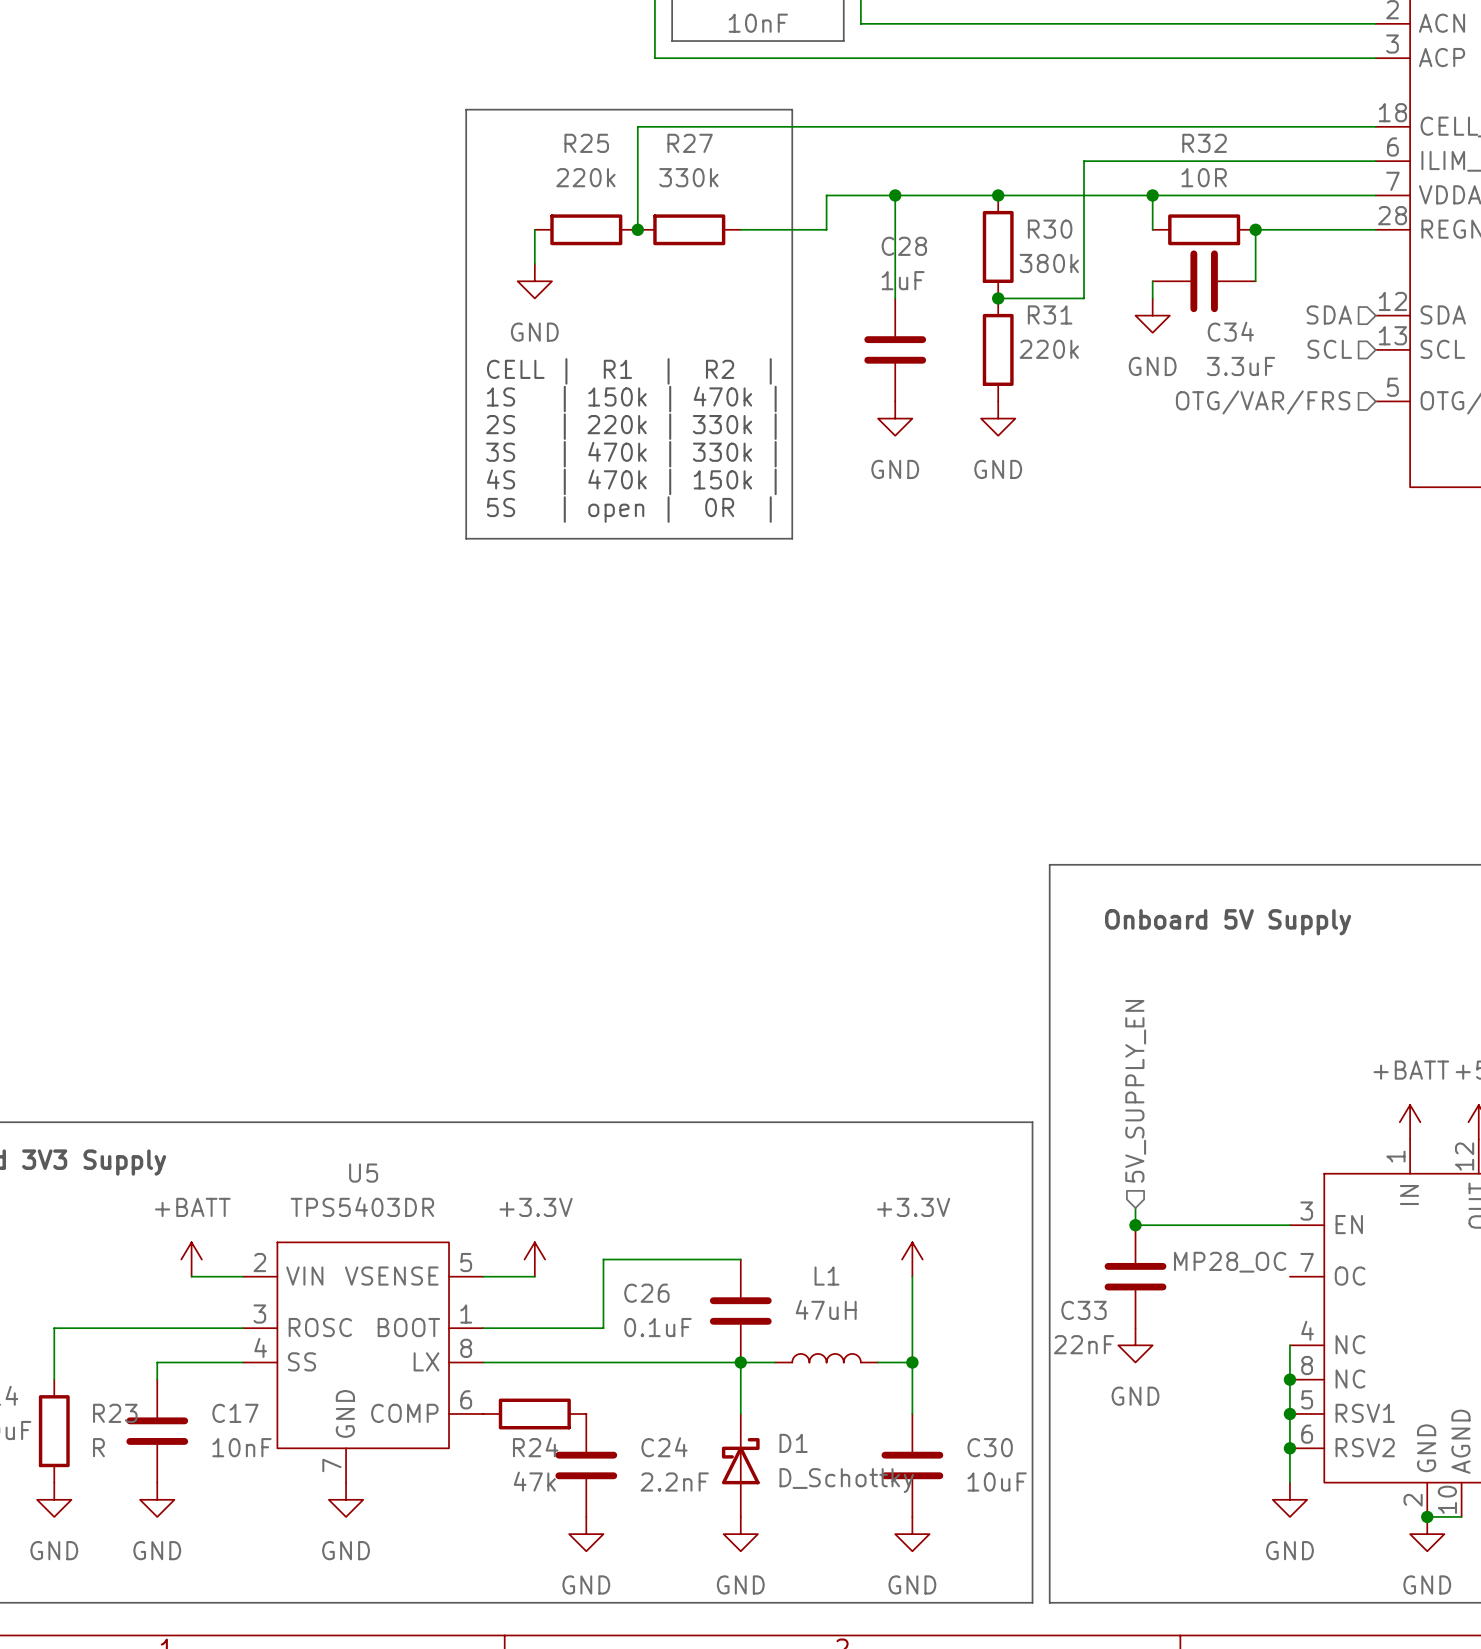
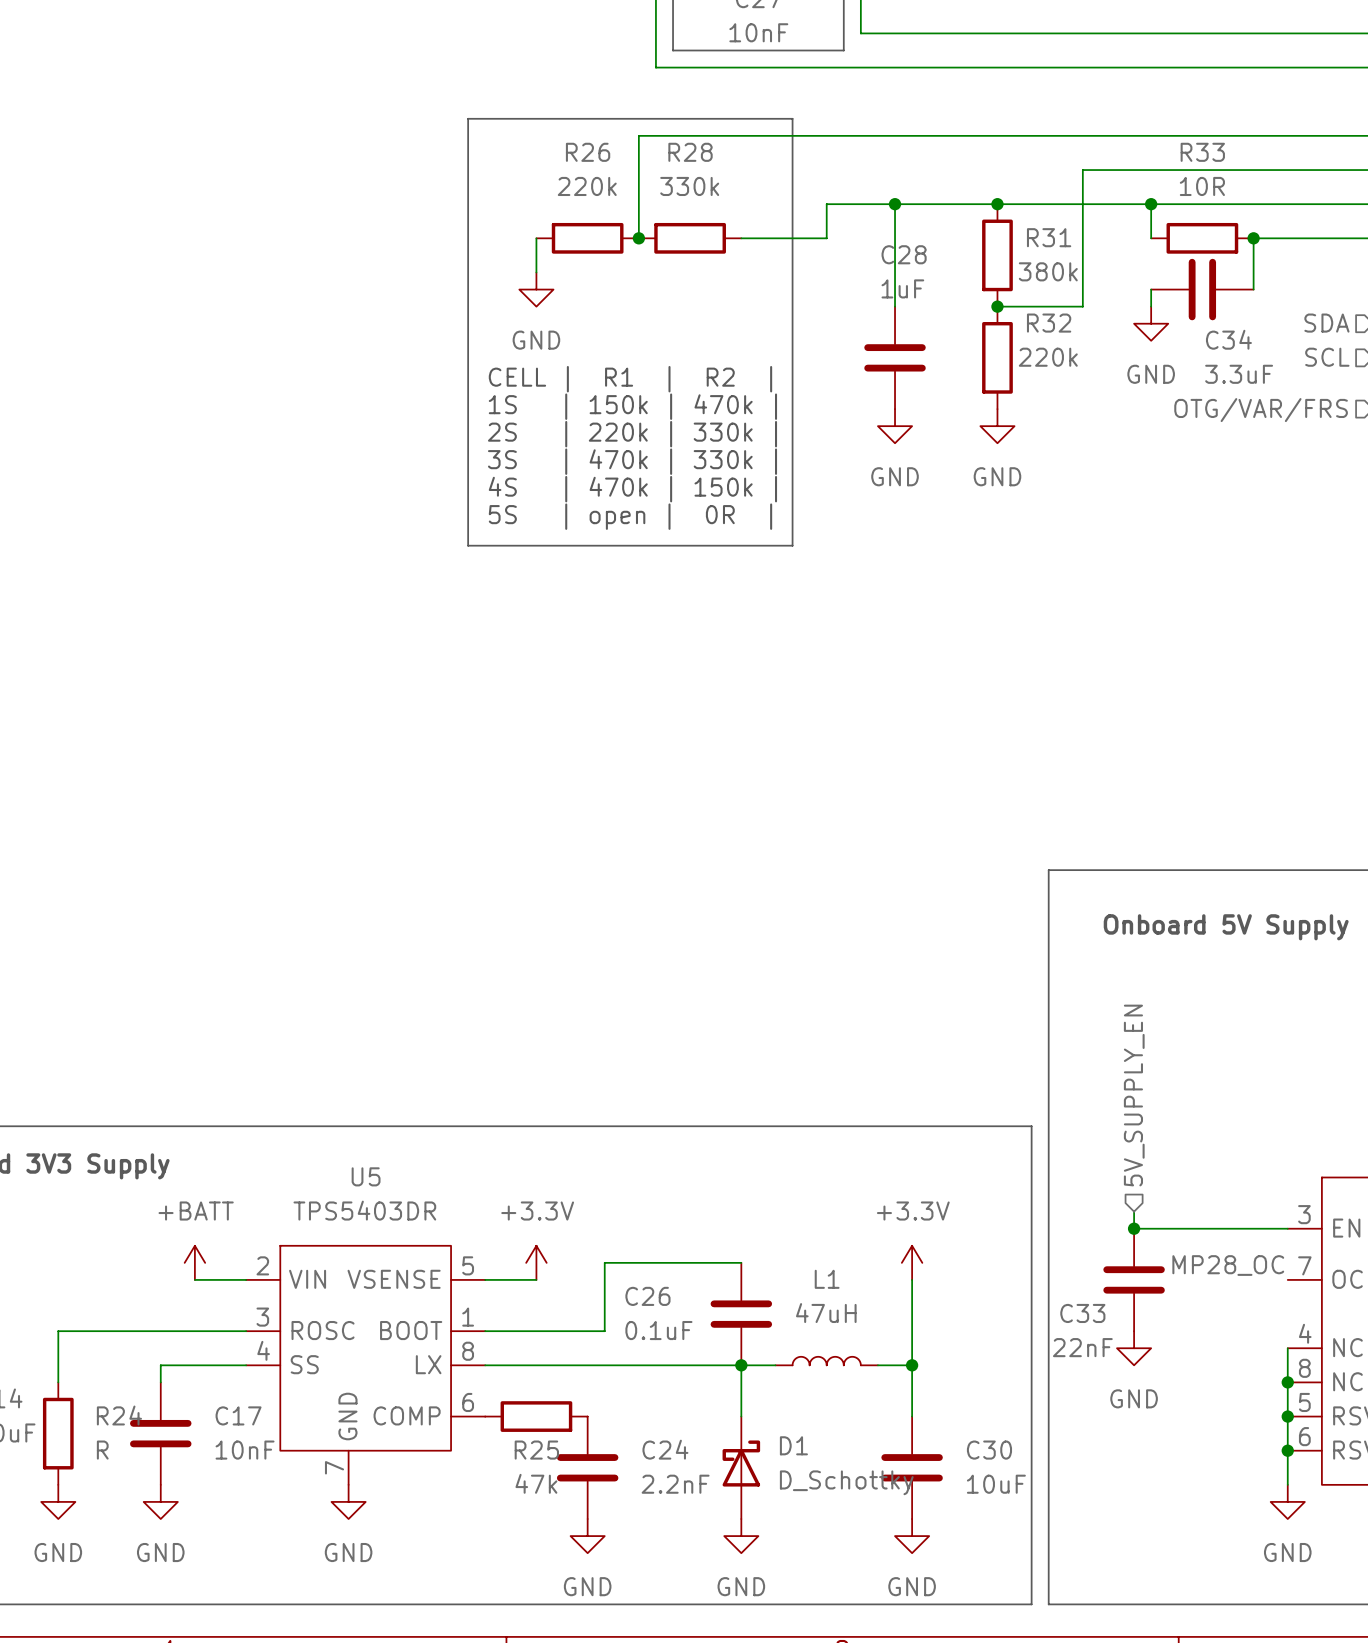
R25 name: R25 (586, 143) -> R26 (588, 152)
R27 name: R27 (690, 143) -> R28 (690, 152)
R32 name: R32 (1204, 143) -> R33 (1202, 152)
R30 name: R30 (1050, 229) -> R31 (1049, 237)
R31 name: R31 (1050, 314) -> R32 (1049, 323)
R23 name: R23 (115, 1413) -> R24 (119, 1415)
R24 name: R24 (535, 1447) -> R25 (536, 1450)

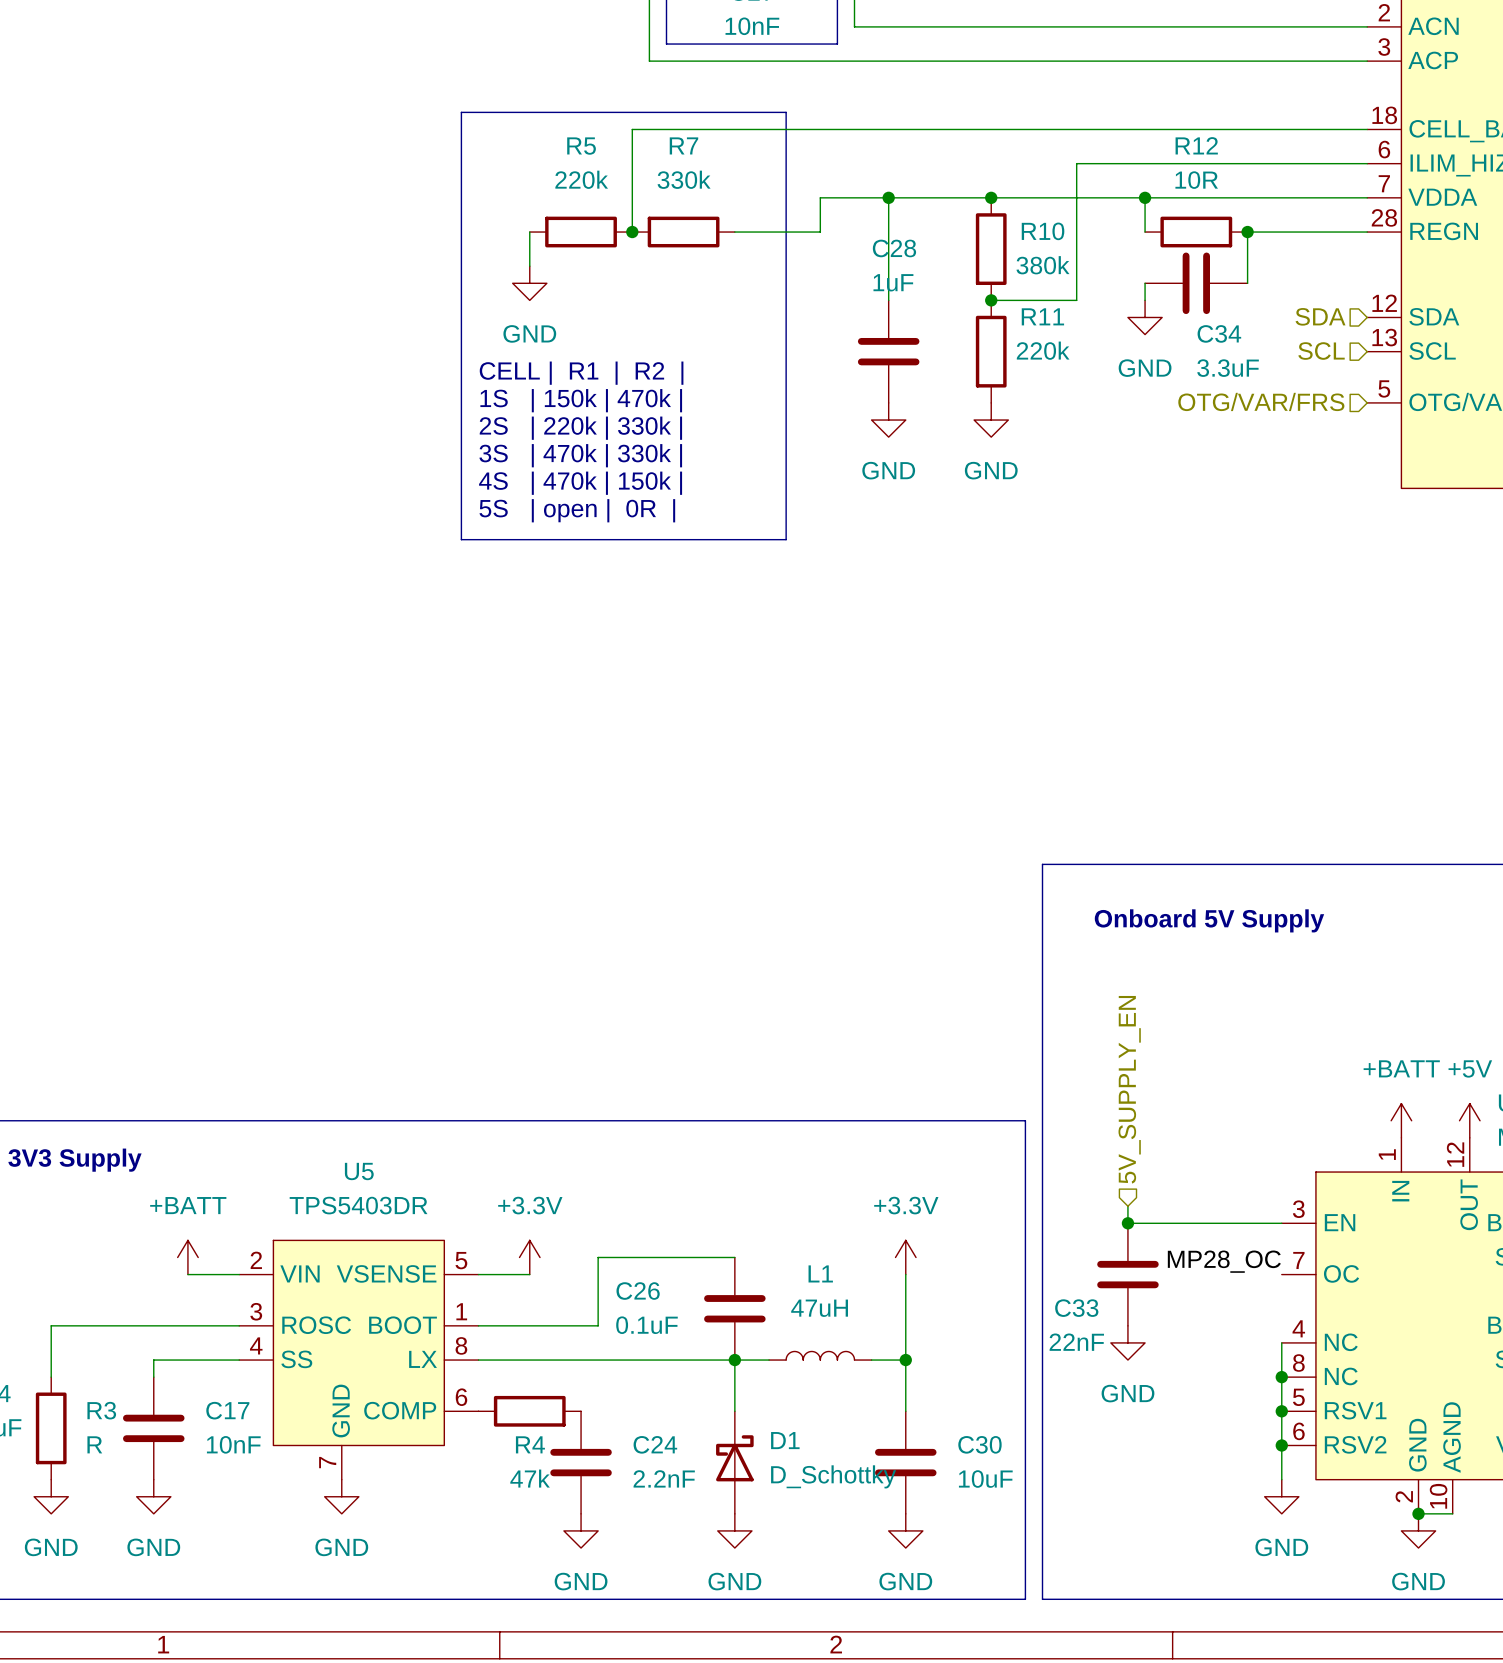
R26 name: R26 (588, 152) -> R5 (581, 146)
R28 name: R28 (690, 152) -> R7 (683, 145)
R33 name: R33 (1202, 152) -> R12 (1196, 145)
R31 name: R31 (1049, 237) -> R10 (1043, 231)
R32 name: R32 (1049, 323) -> R11 (1042, 316)
R24 name: R24 (119, 1415) -> R3 (101, 1410)
R25 name: R25 (536, 1450) -> R4 (530, 1444)

